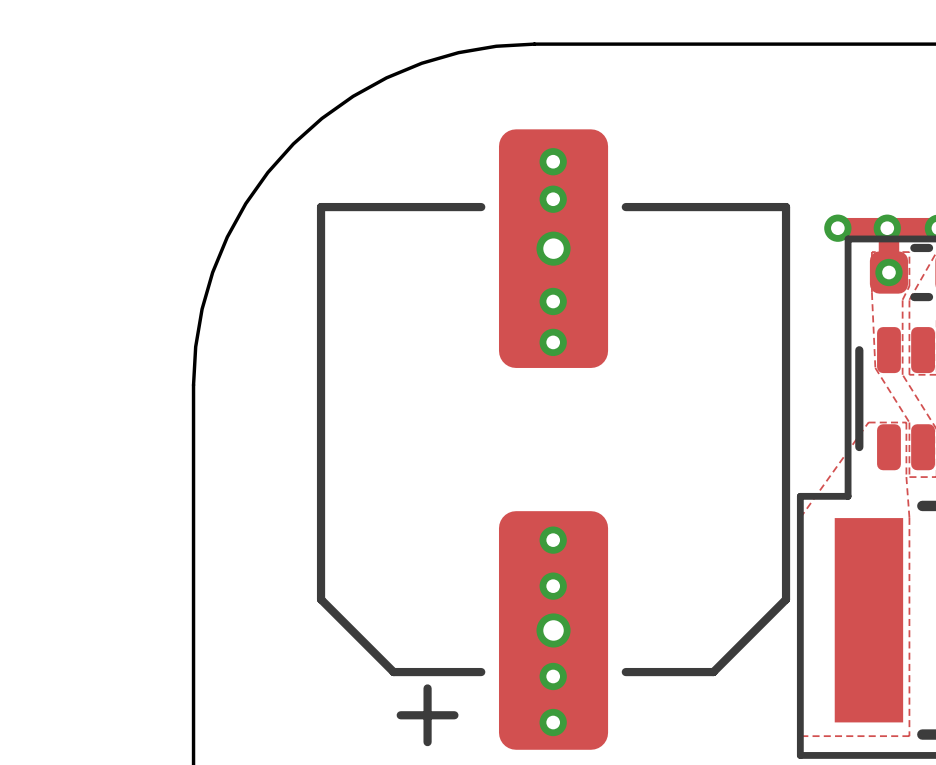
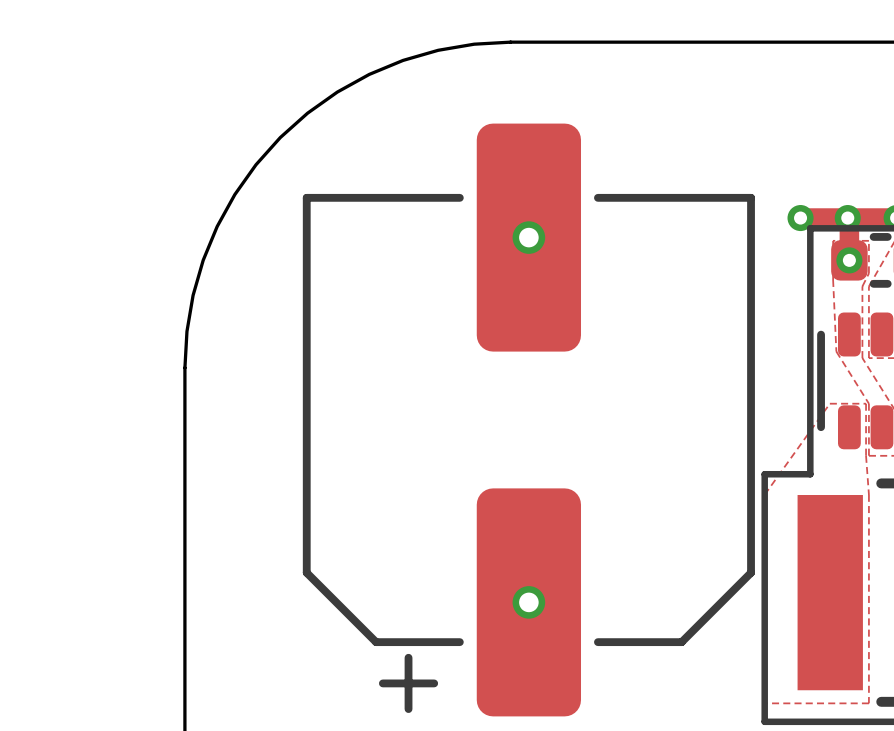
via: (553, 161) -> none
via: (553, 199) -> none
via: (553, 301) -> none
via: (553, 342) -> none
via: (553, 540) -> none
via: (553, 586) -> none
via: (553, 676) -> none
via: (553, 722) -> none

